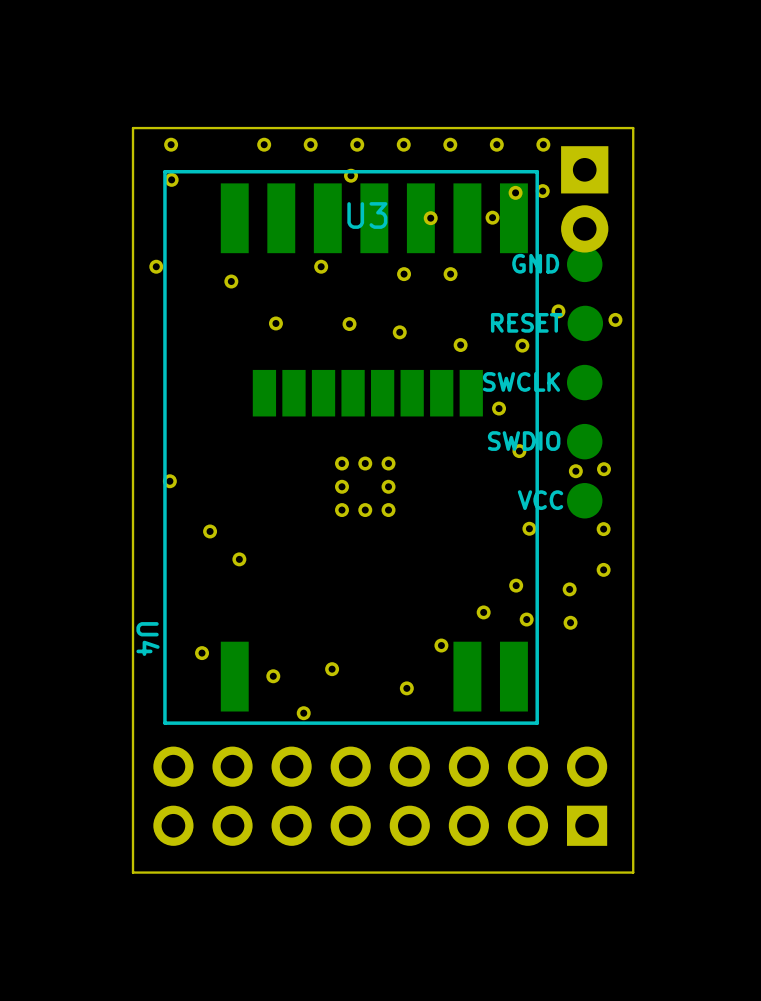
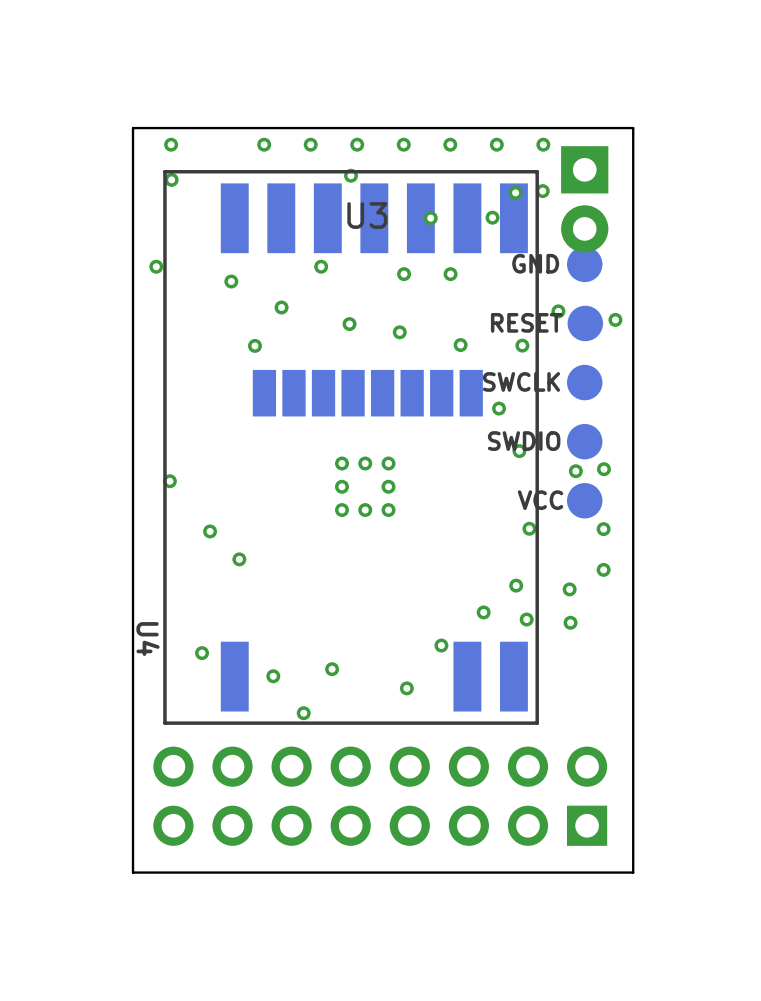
part: none -> (281, 307)
part: (275, 323) -> none
part: none -> (254, 345)

